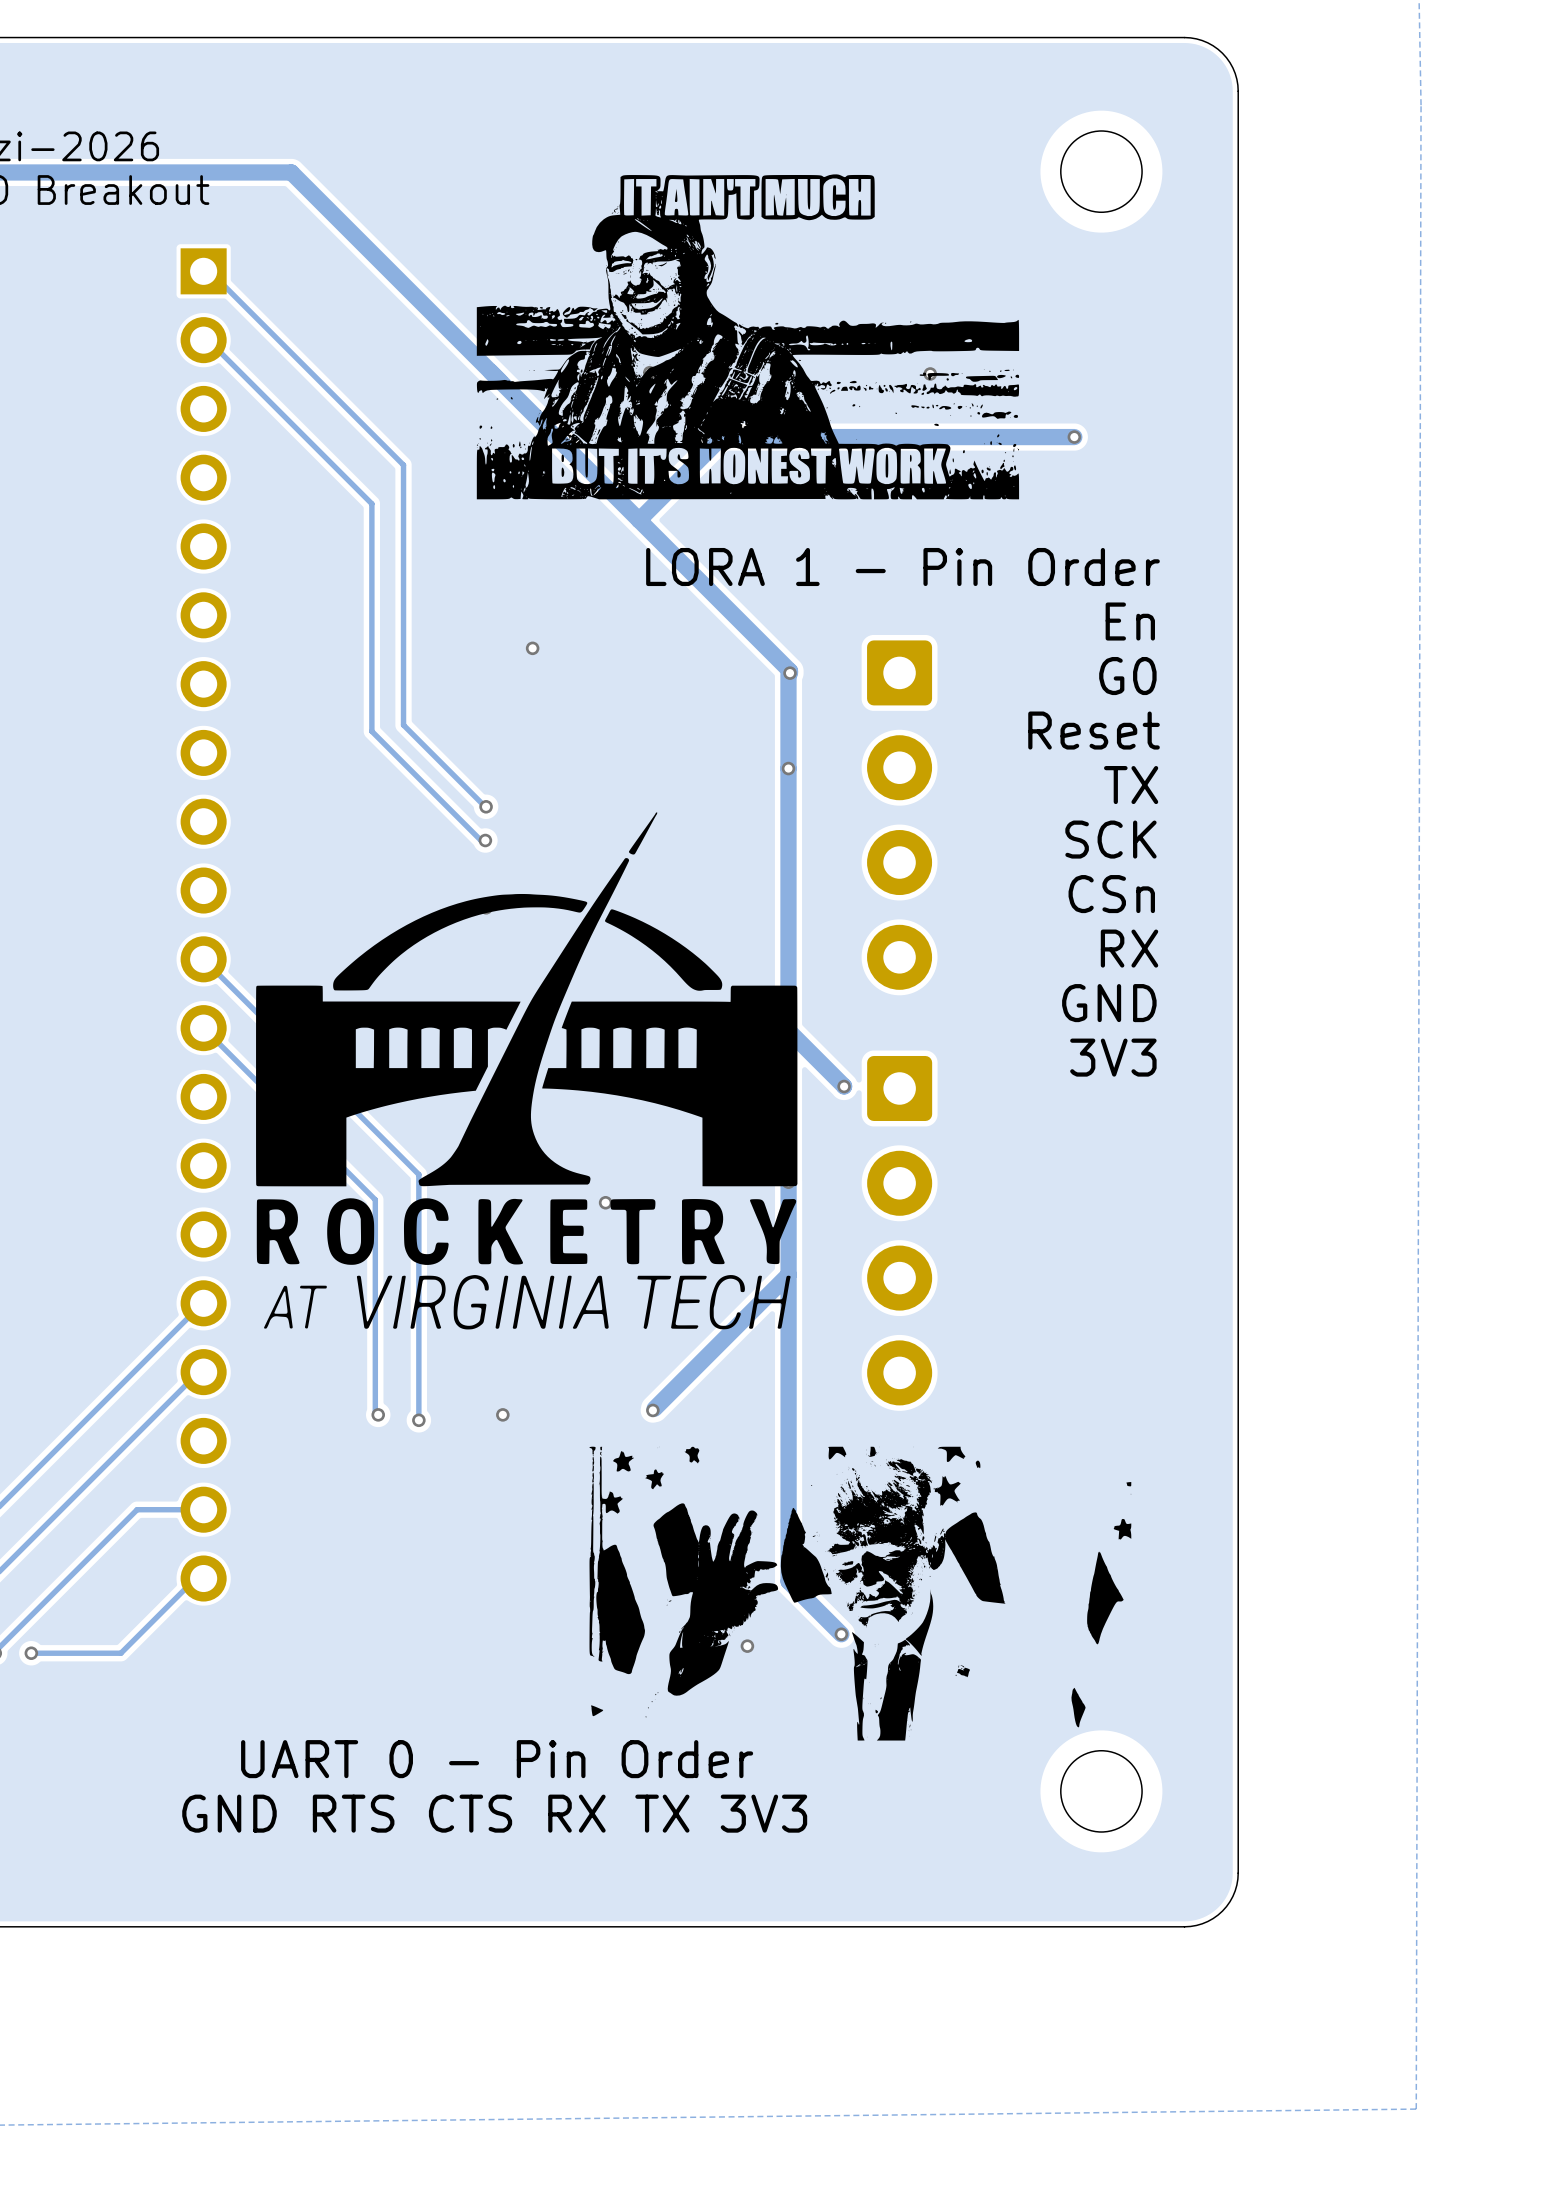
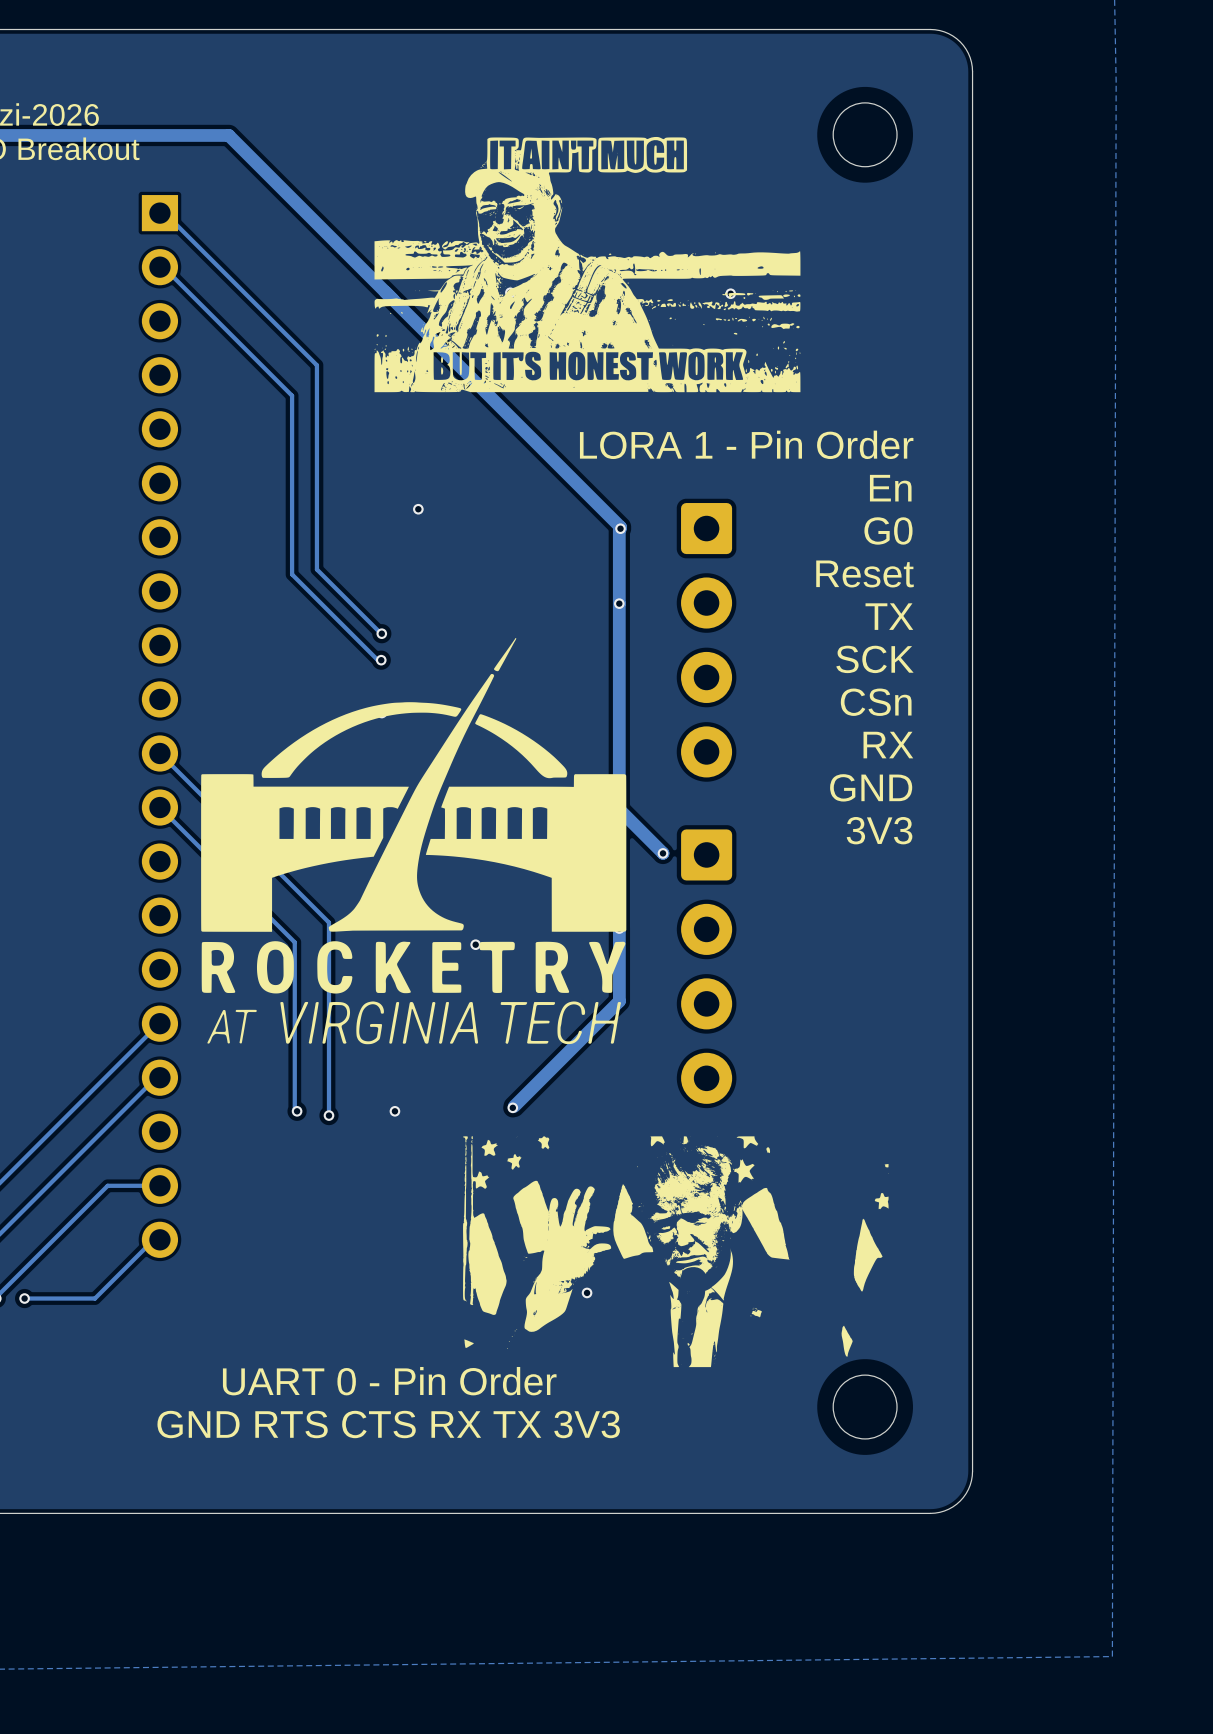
track: (1074, 437) (722, 437) (639, 520) -> none
via: (1074, 437) -> none
track: (788, 1274) (788, 1581) (841, 1634) -> none
via: (841, 1634) -> none

